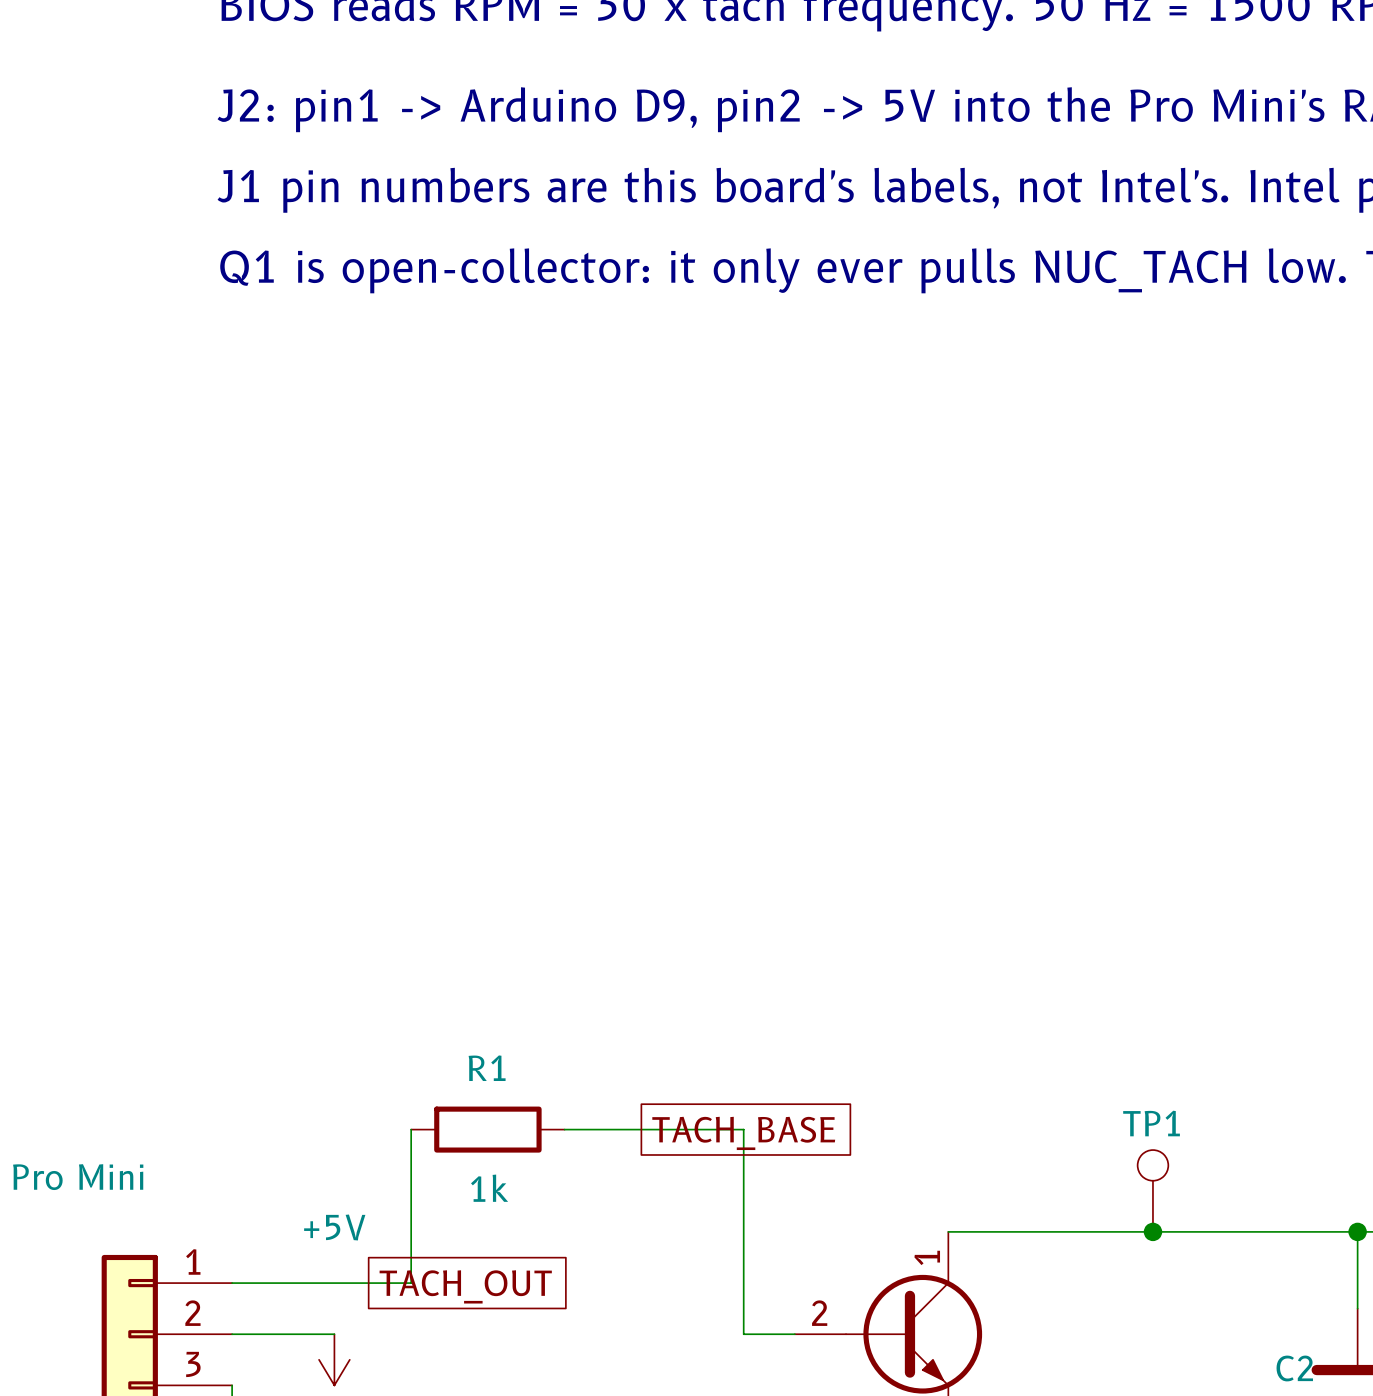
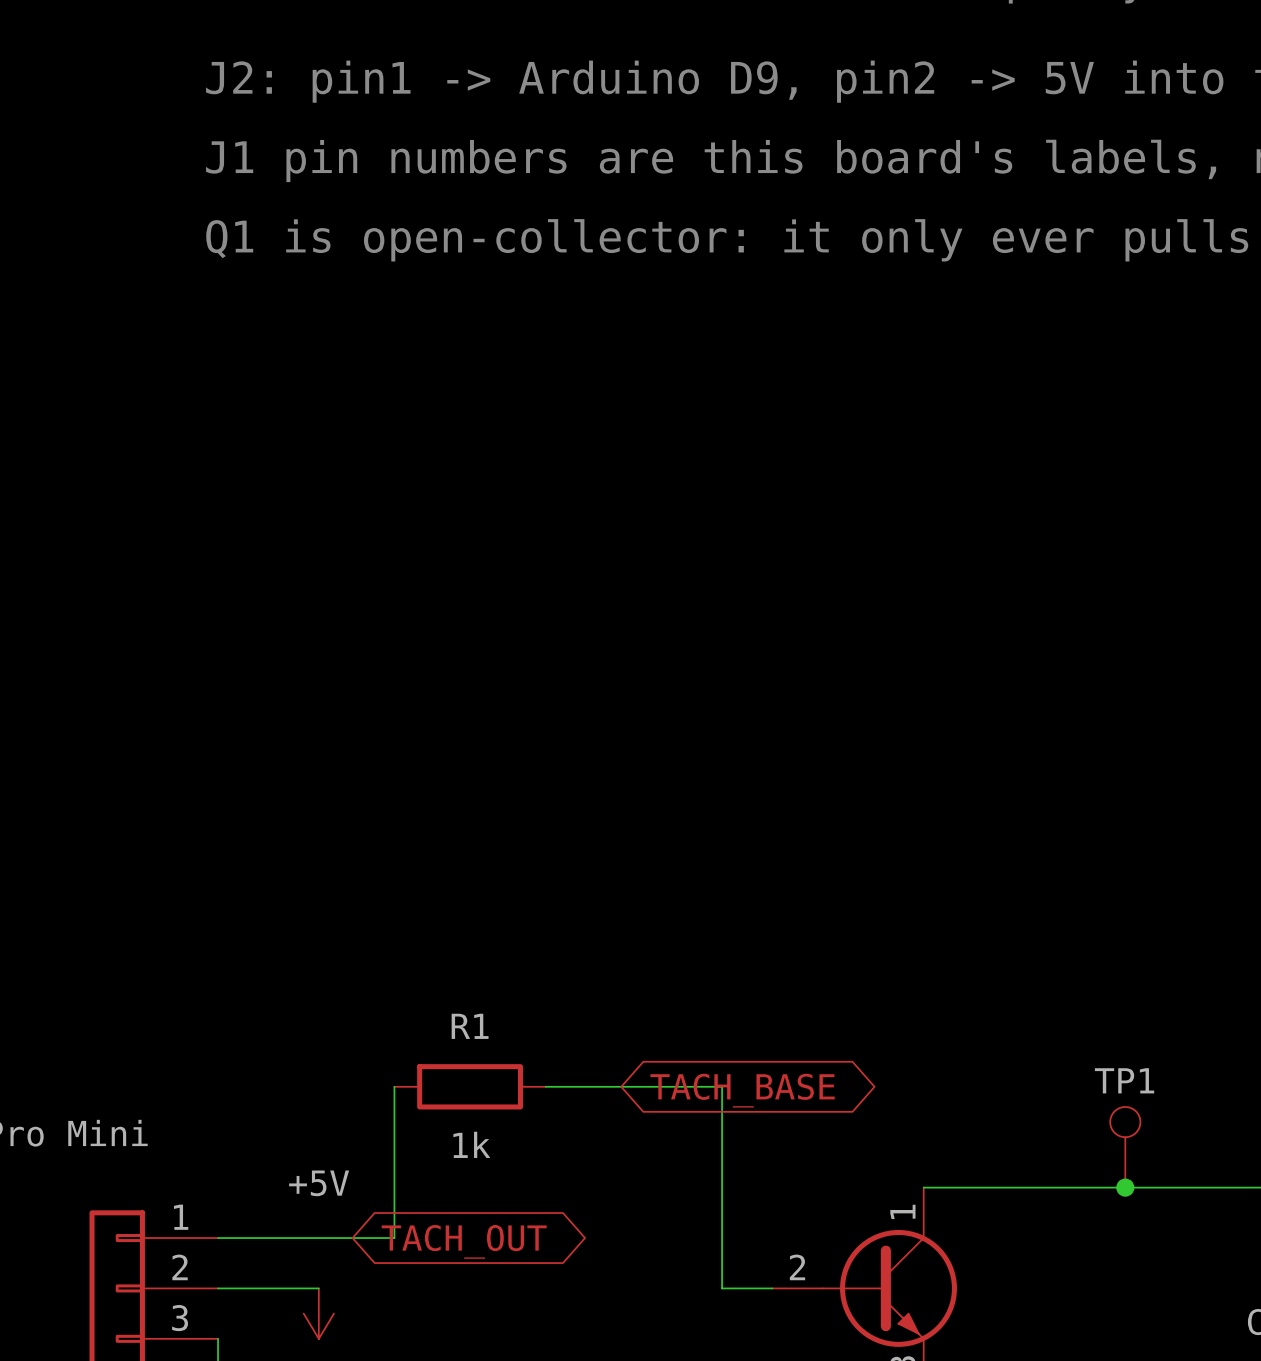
global label shape: passive (743, 1133) -> bidirectional (742, 1090)
global label shape: passive (465, 1286) -> bidirectional (464, 1241)

